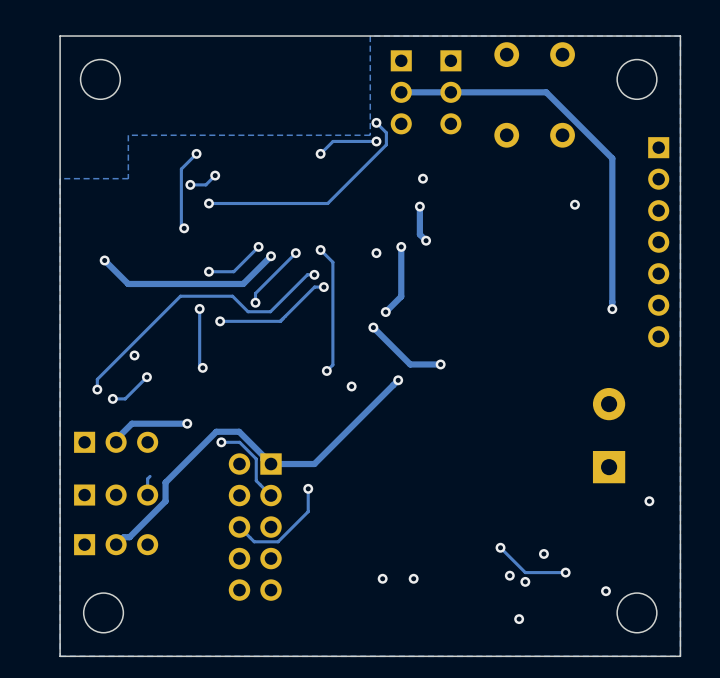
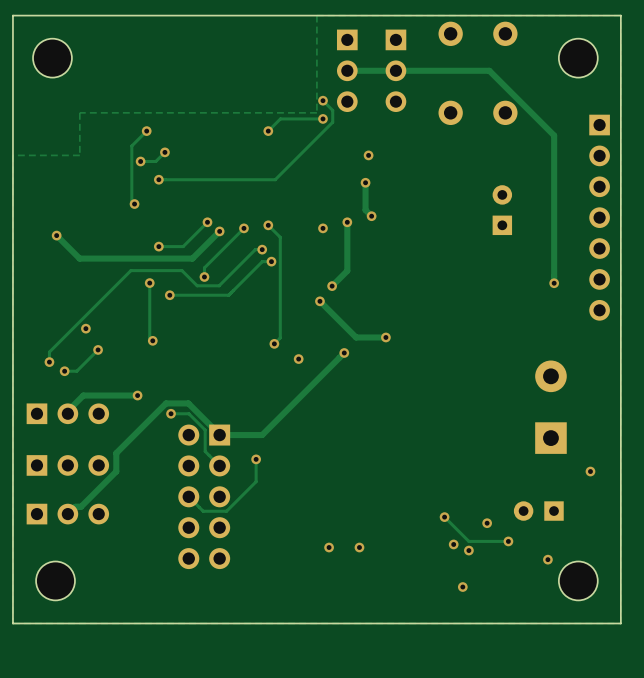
via: (574, 204) -> none
part: none -> (502, 210)
track: (150, 476) (147, 478) (147, 495) -> none
part: none -> (538, 511)

